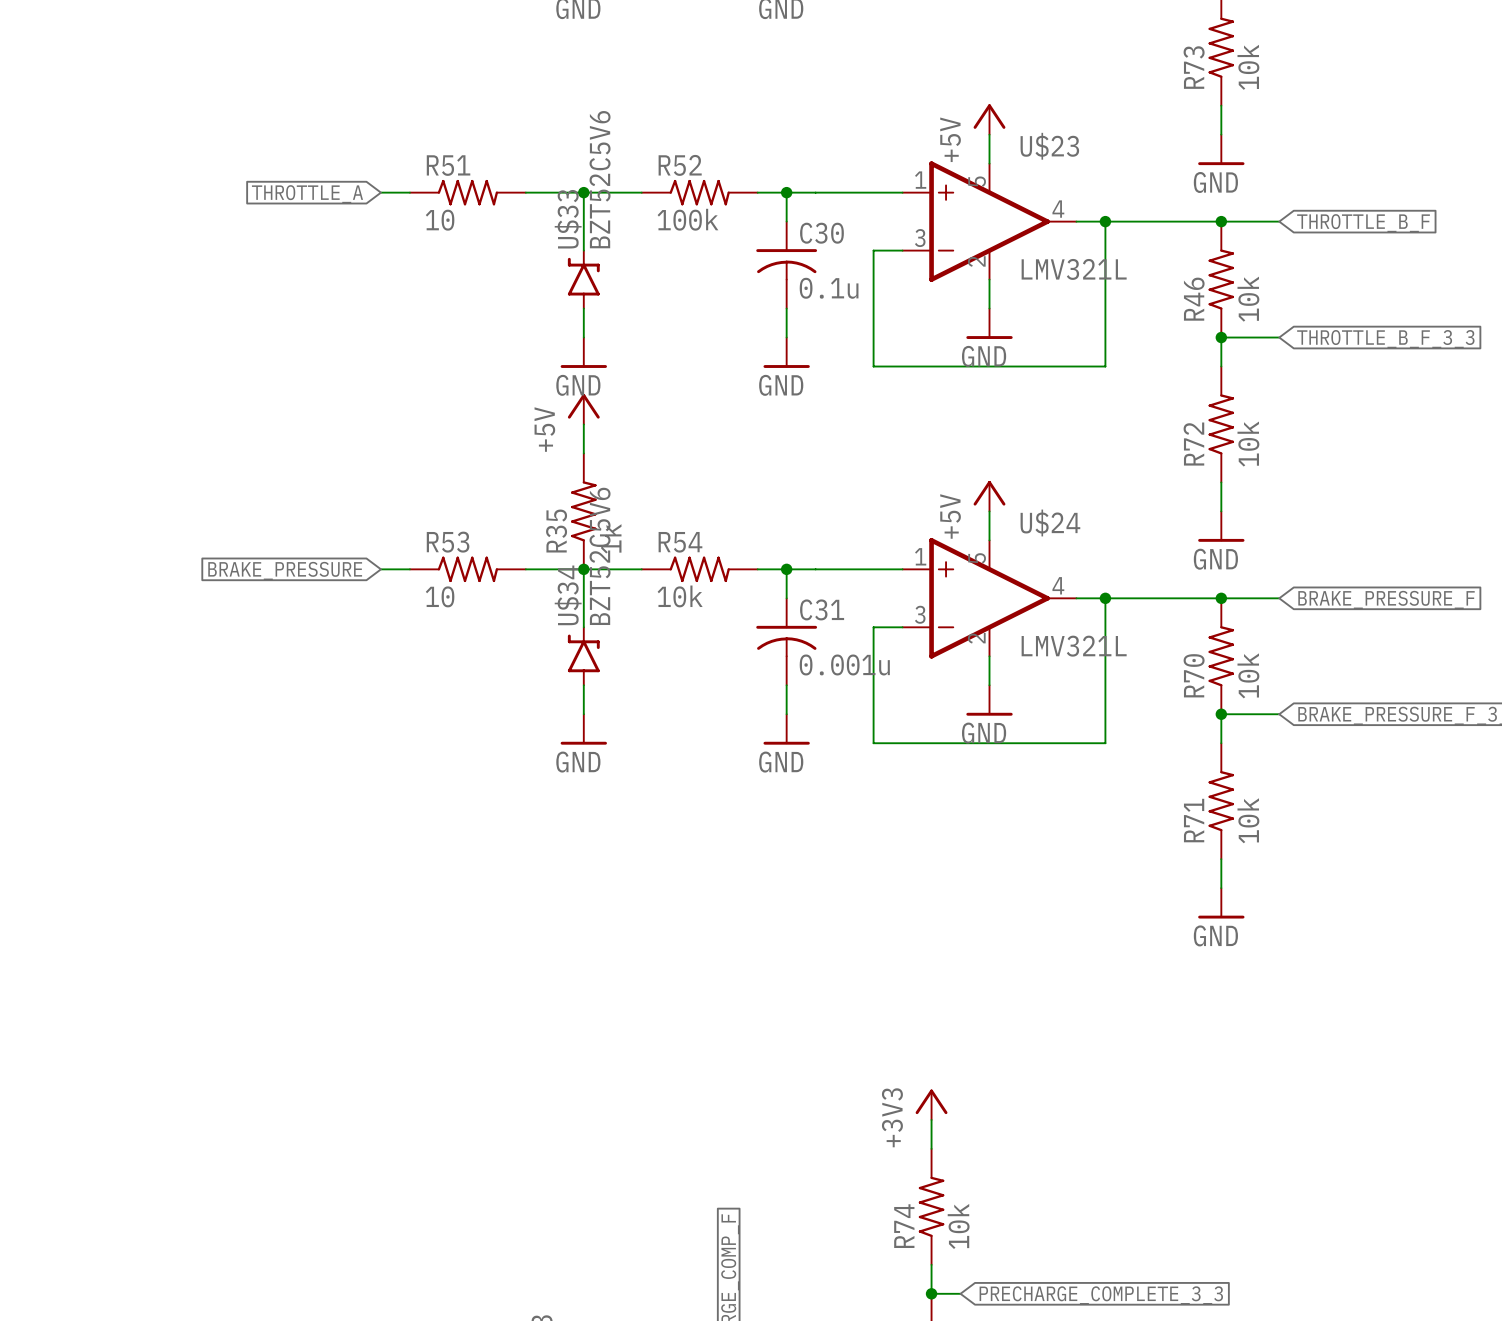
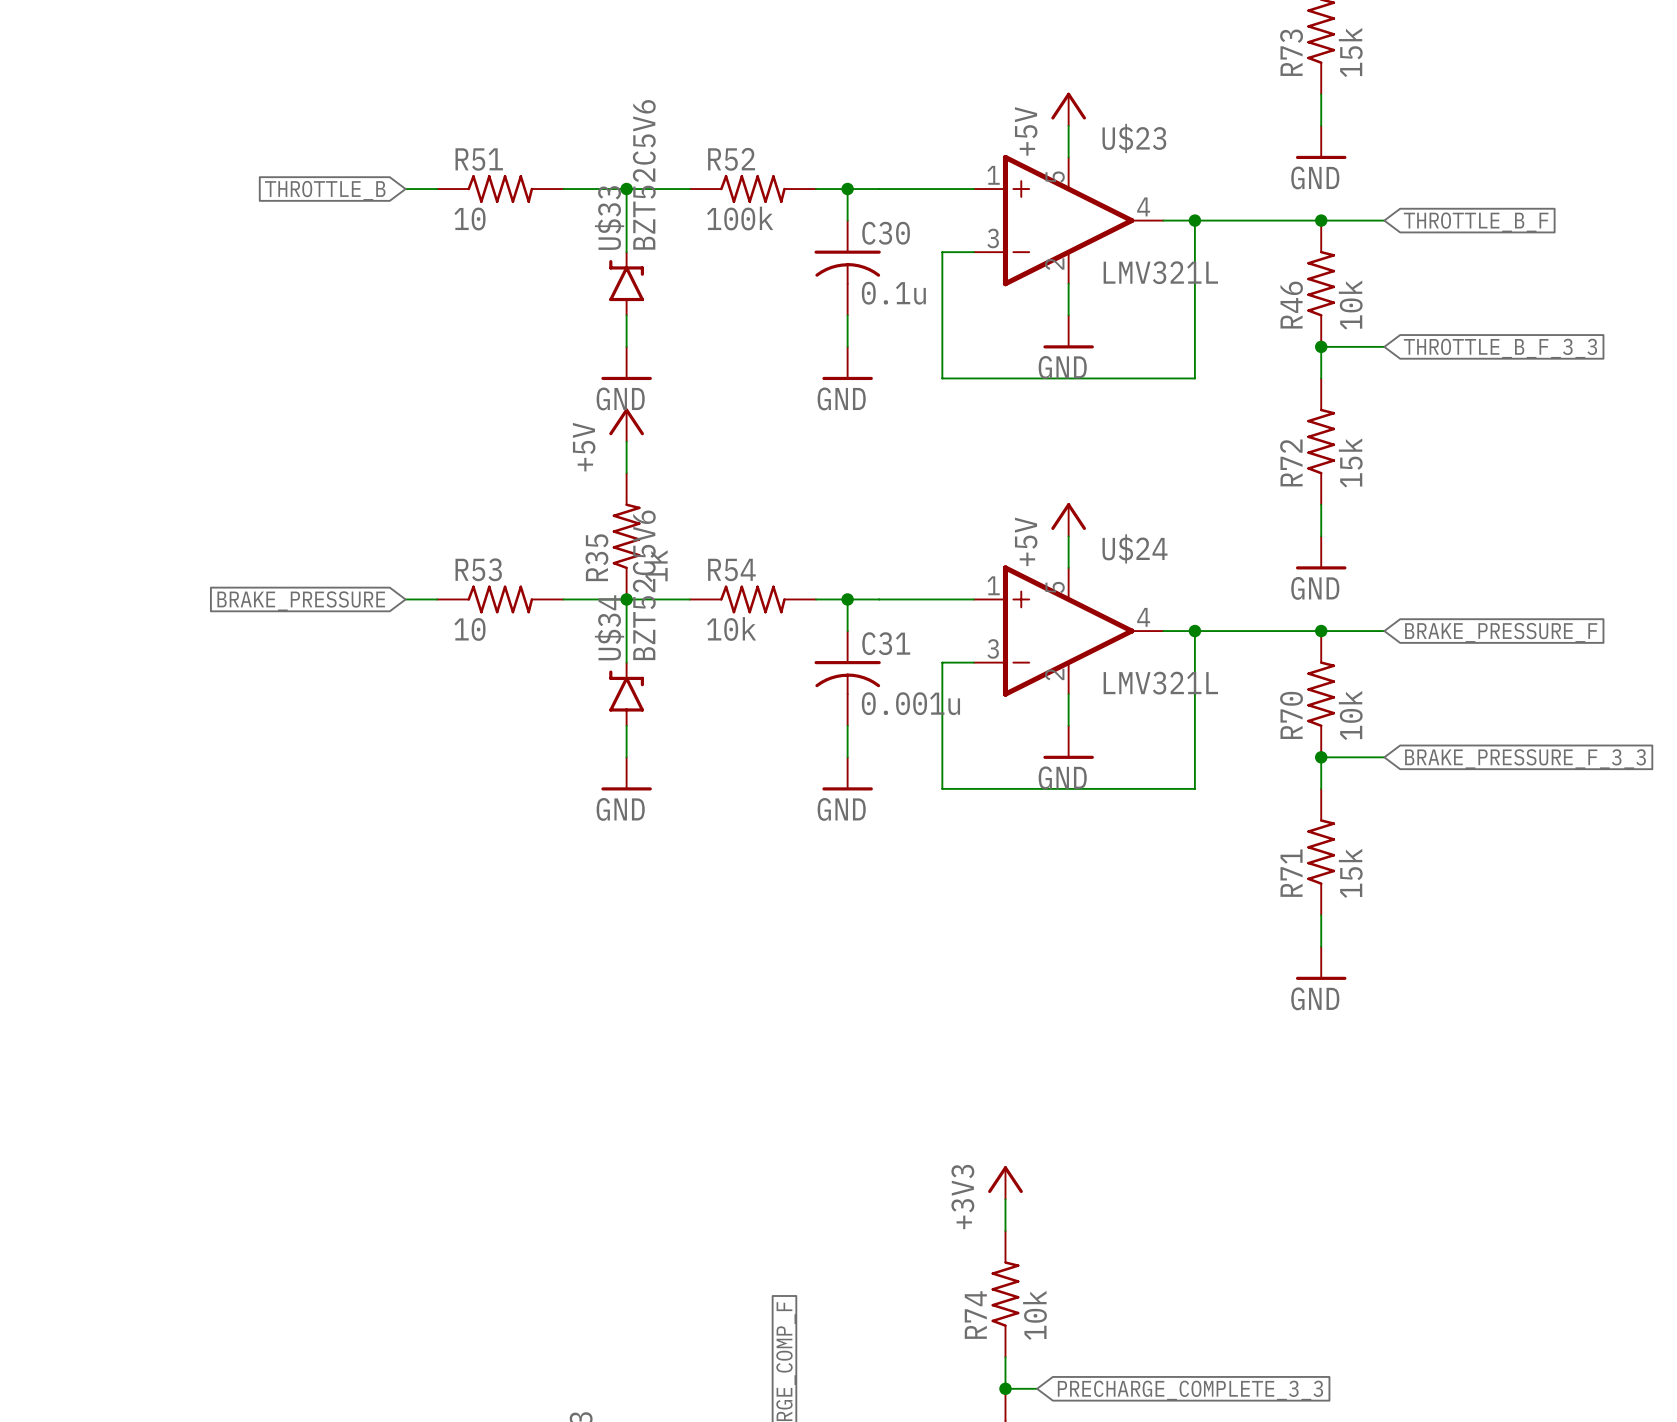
R73 value: 10k (1248, 67) -> 15k (1350, 52)
global label: THROTTLE_A (307, 194) -> THROTTLE_B (325, 190)
R72 value: 10k (1248, 444) -> 15k (1350, 462)
R71 value: 10k (1248, 820) -> 15k (1350, 873)

